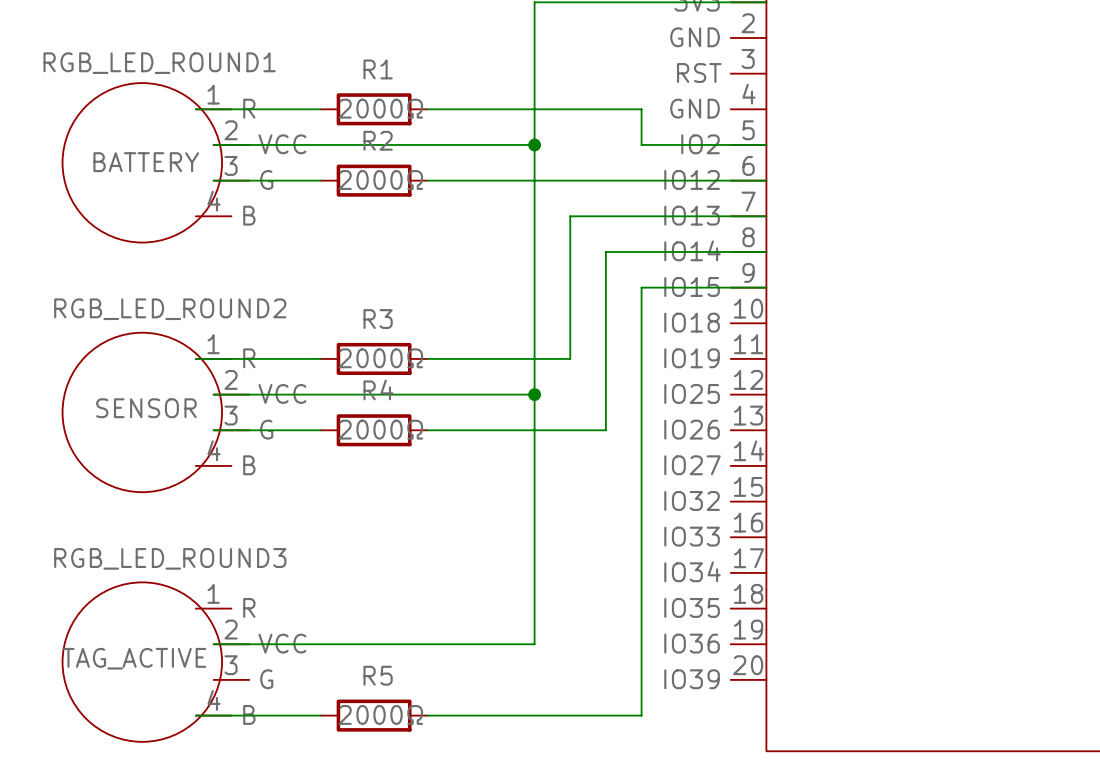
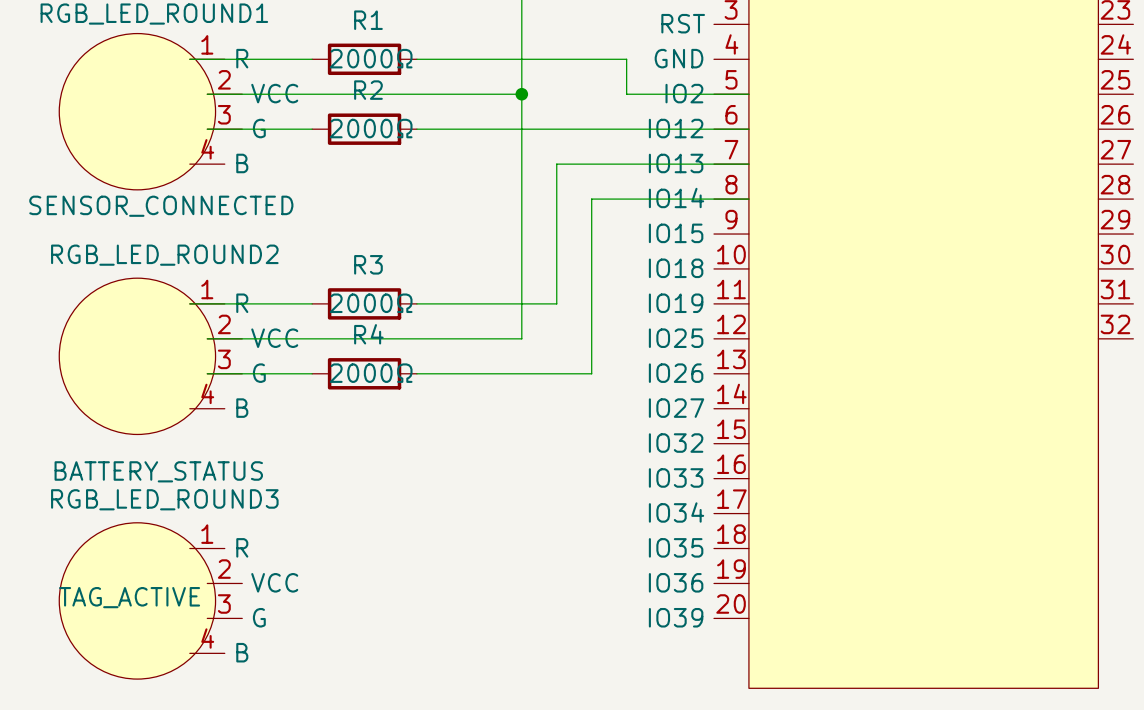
RGB_LED_ROUND1 value: BATTERY (146, 162) -> SENSOR_CONNECTED (161, 206)
wire: (766, 287) (641, 287) (641, 715) (427, 715) -> none
wire: (534, 394) (534, 644) (213, 644) -> none
junction: (534, 394) -> none
RGB_LED_ROUND2 value: SENSOR (146, 408) -> BATTERY_STATUS (158, 471)
wire: (195, 715) (320, 715) -> none
R5: 2000Ω (374, 715) -> none

